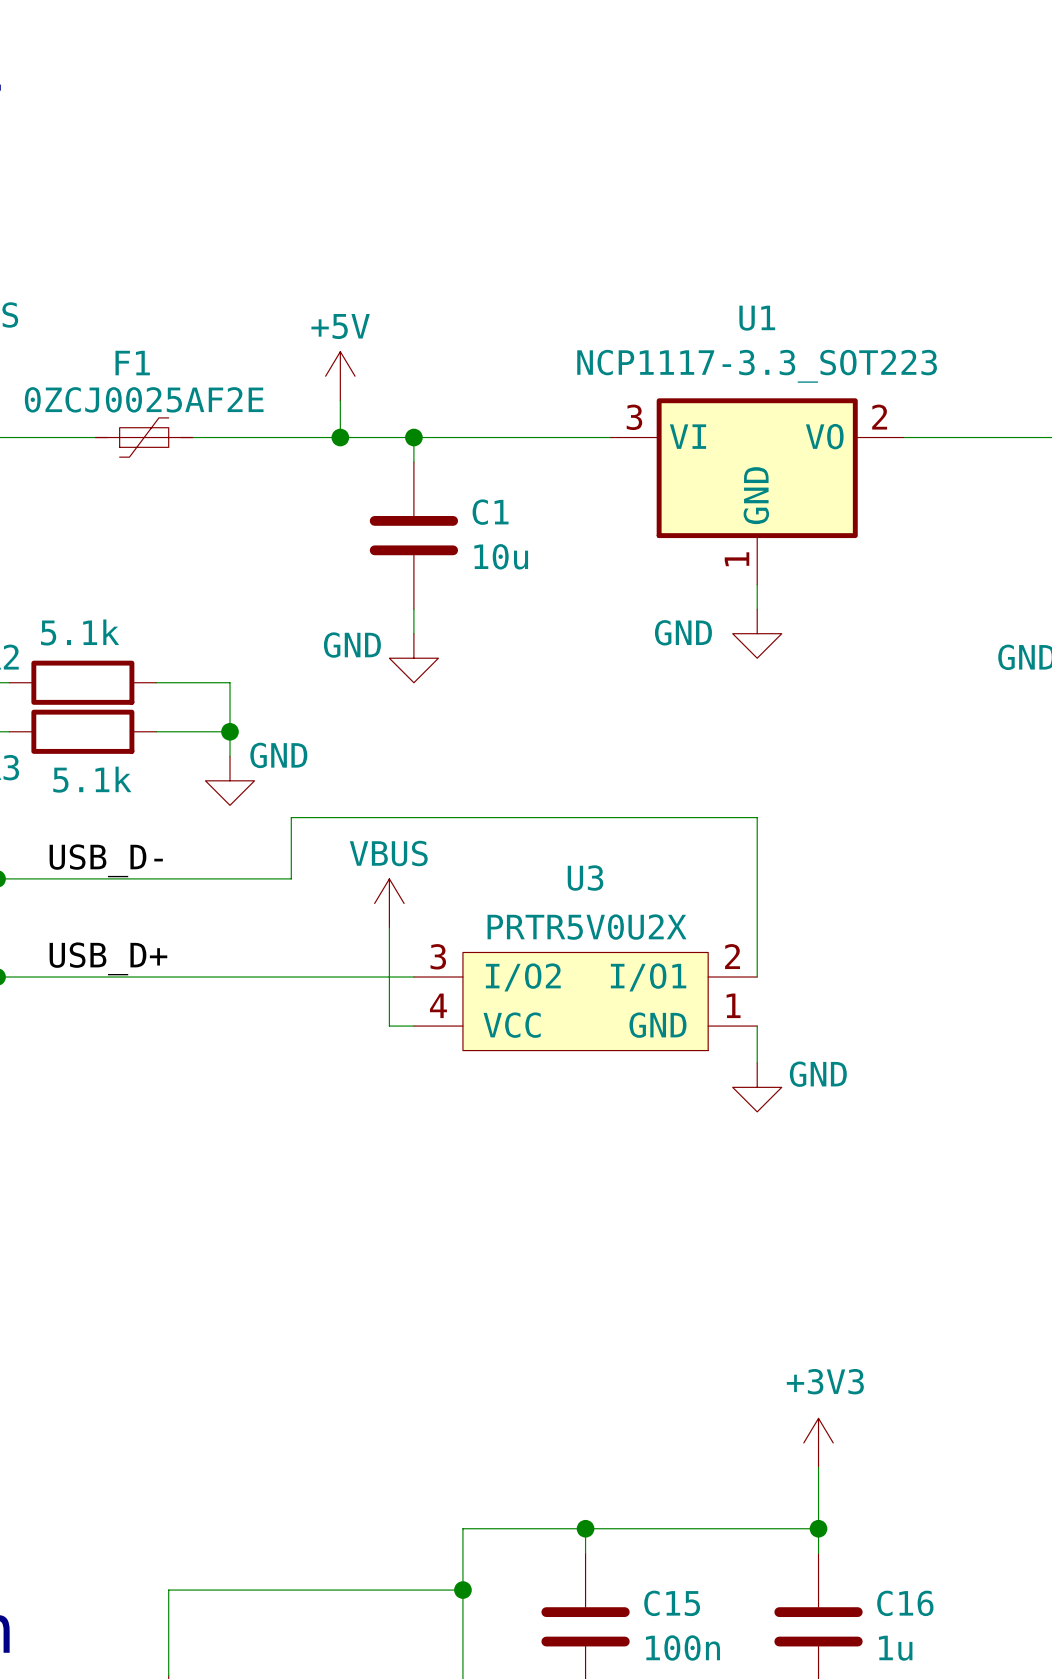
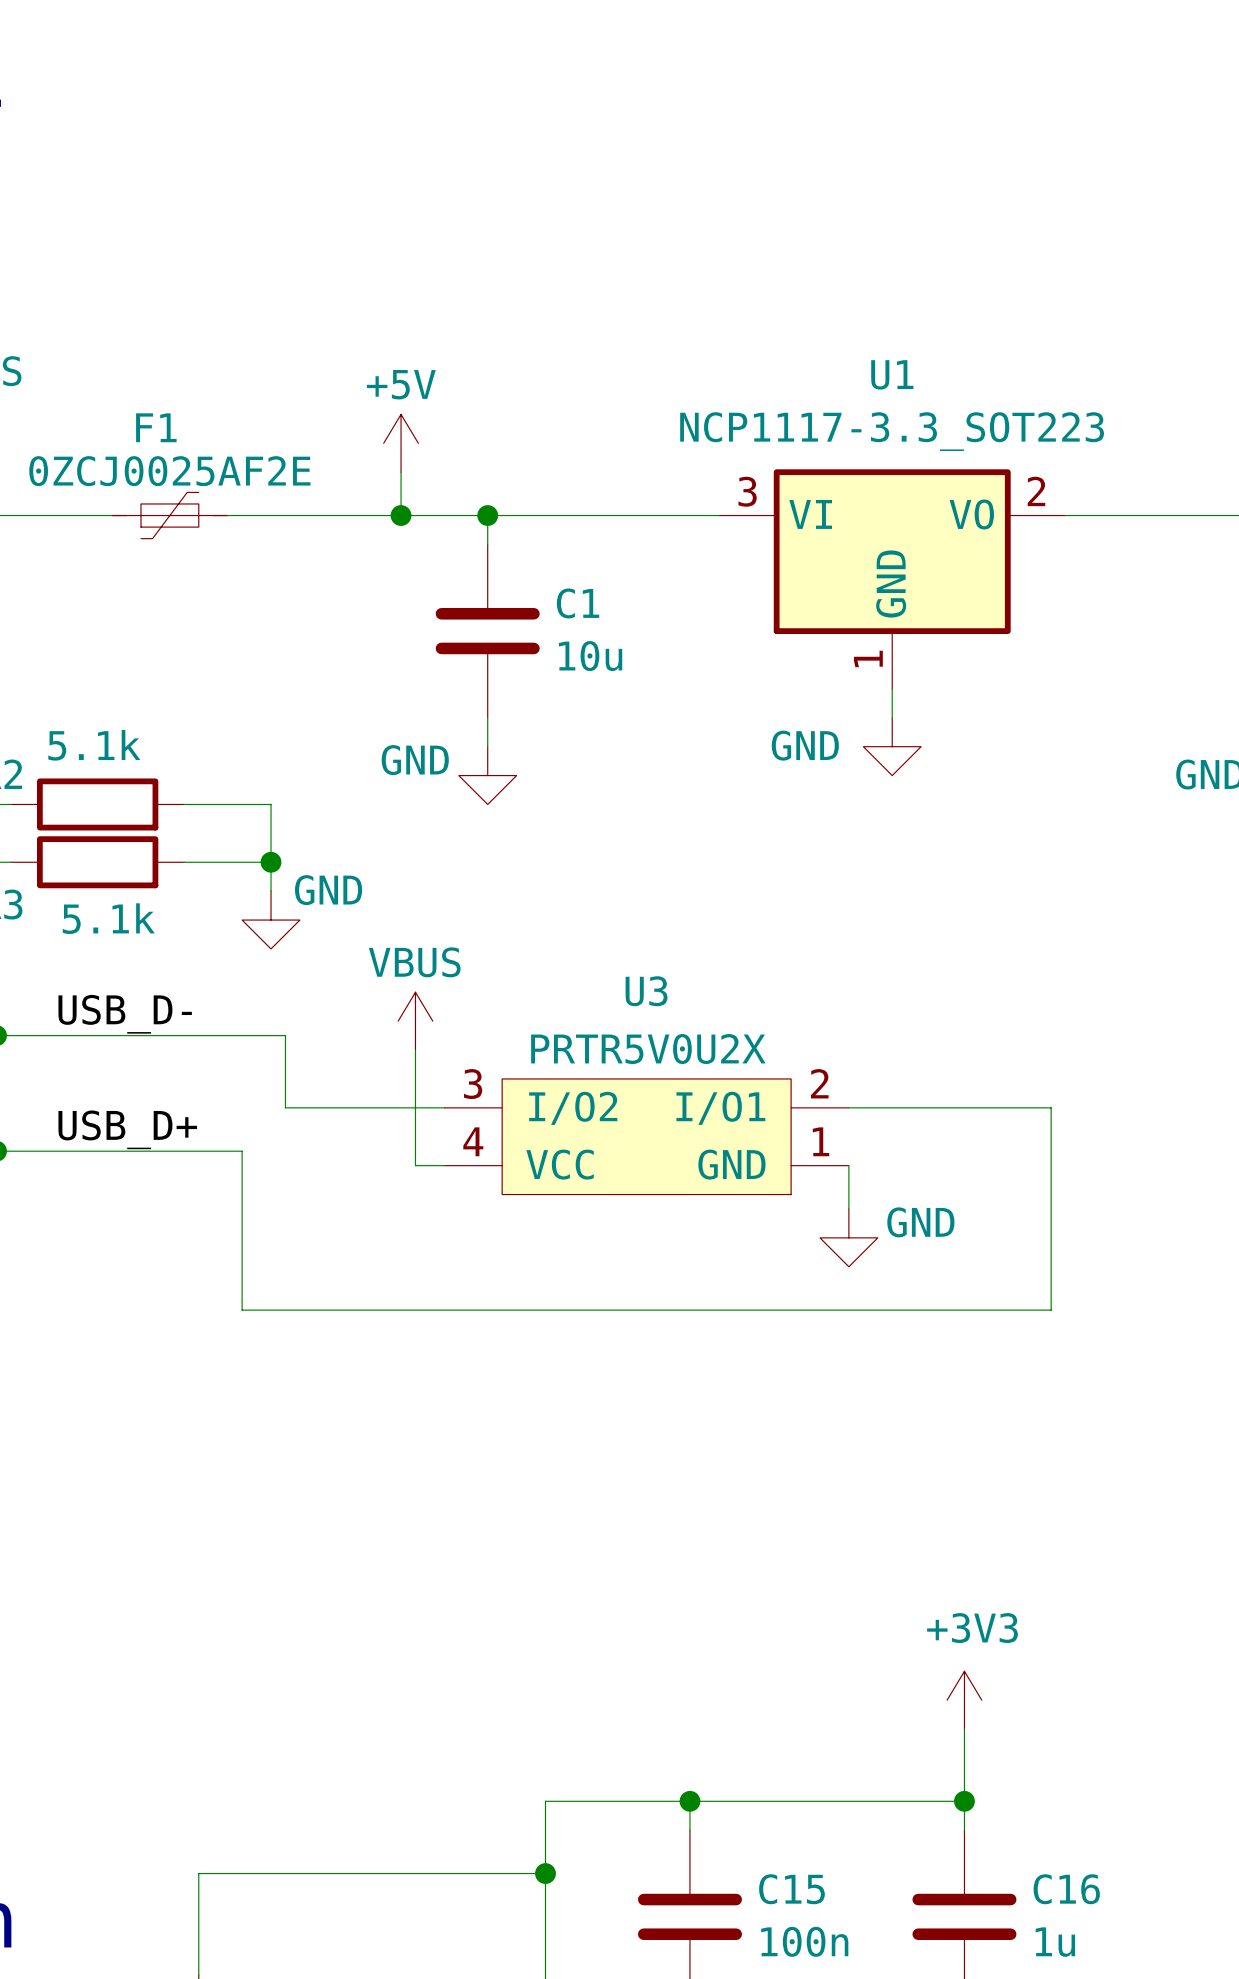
wire: (242, 878) (291, 878) (291, 817) (757, 817) (757, 977) -> (285, 1035) (285, 1107) (444, 1107)
power symbol position: VBUS (389, 903) -> VBUS (415, 1021)
wire: (389, 927) (389, 1026) (413, 1026) -> (415, 1050) (415, 1165) (444, 1165)
wire: (205, 977) (413, 977) -> (242, 1151) (242, 1310) (1051, 1310) (1051, 1107) (848, 1107)
U3 position: (585, 1001) -> (646, 1136)
wire: (757, 1026) (757, 1062) -> (848, 1165) (848, 1208)
power symbol position: GND (757, 1087) -> GND (848, 1237)

